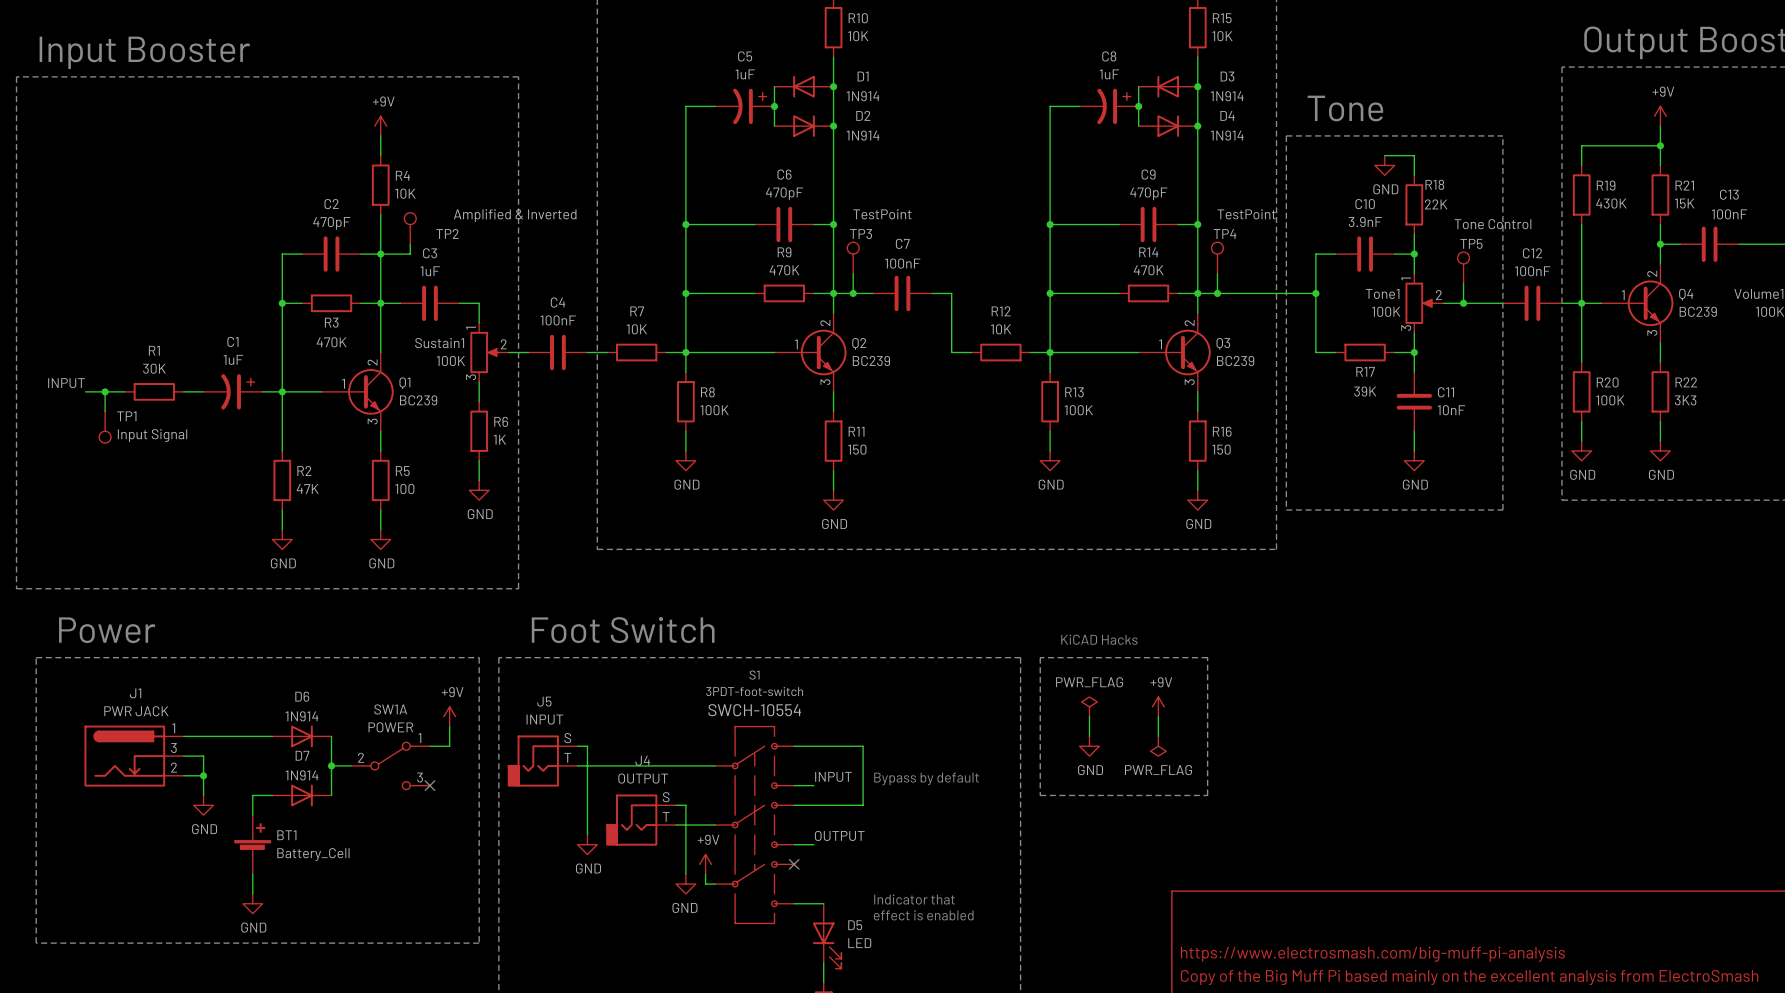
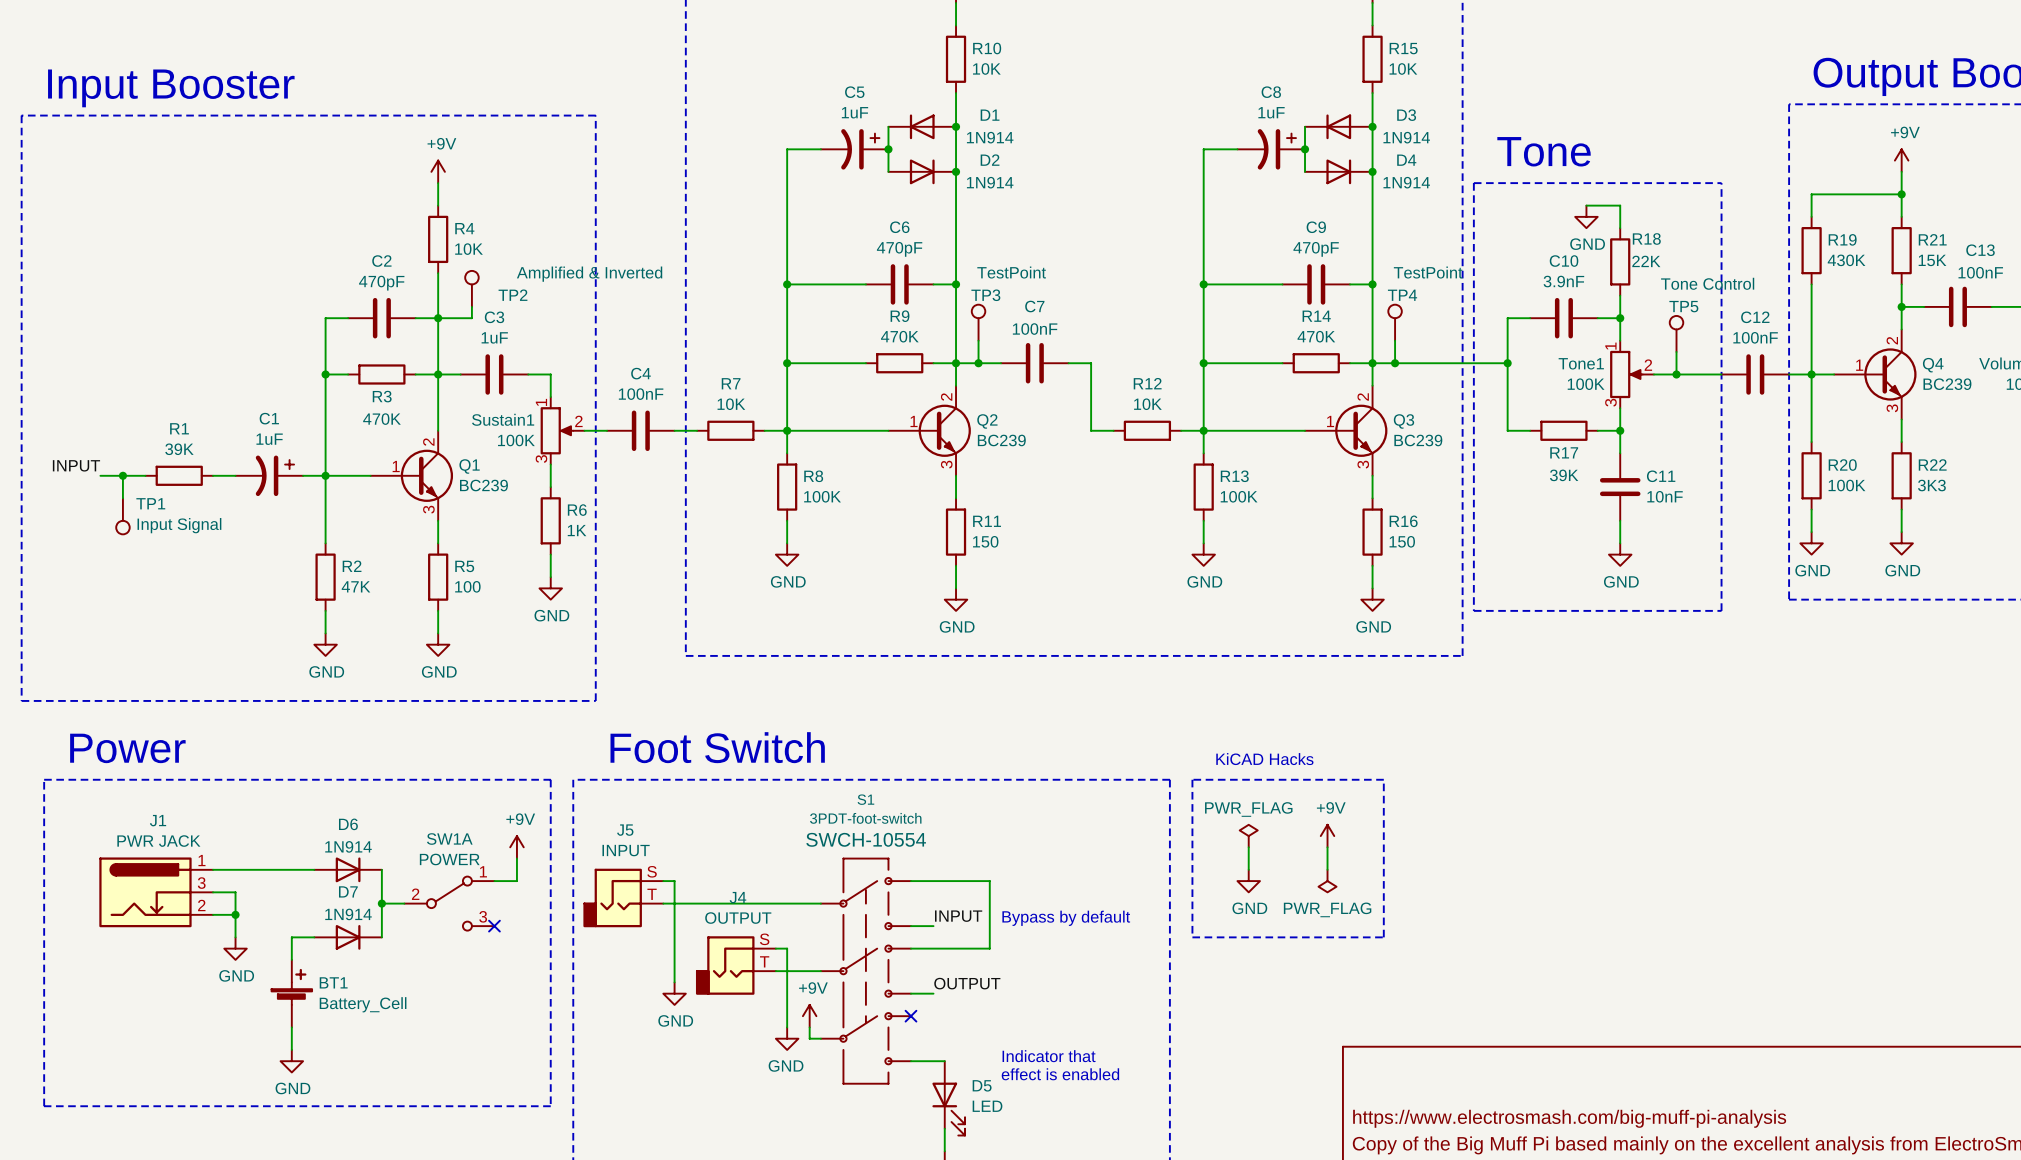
R1 value: 30K (154, 368) -> 39K (179, 449)

